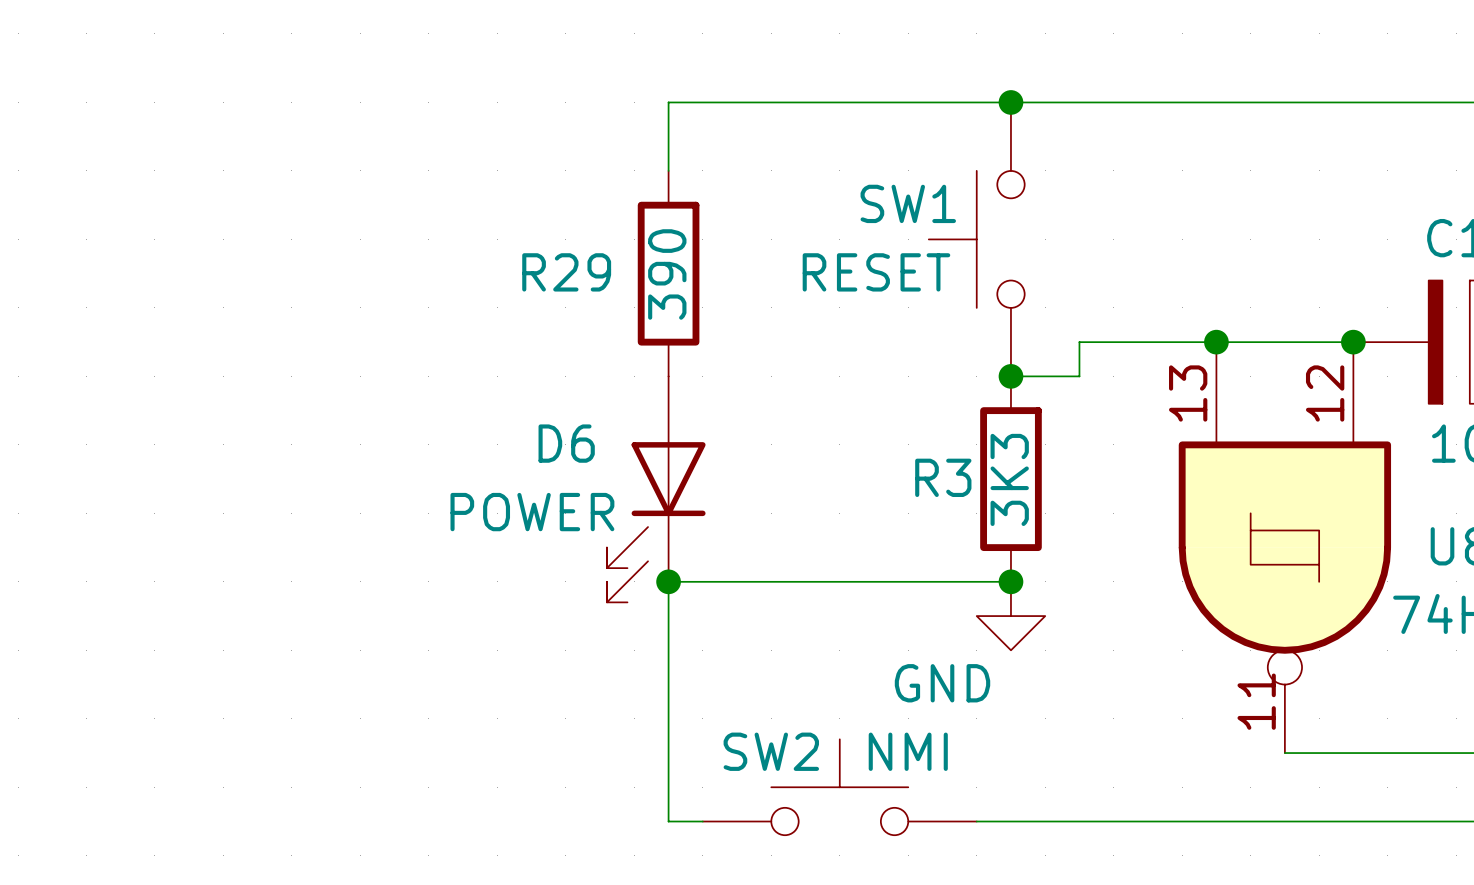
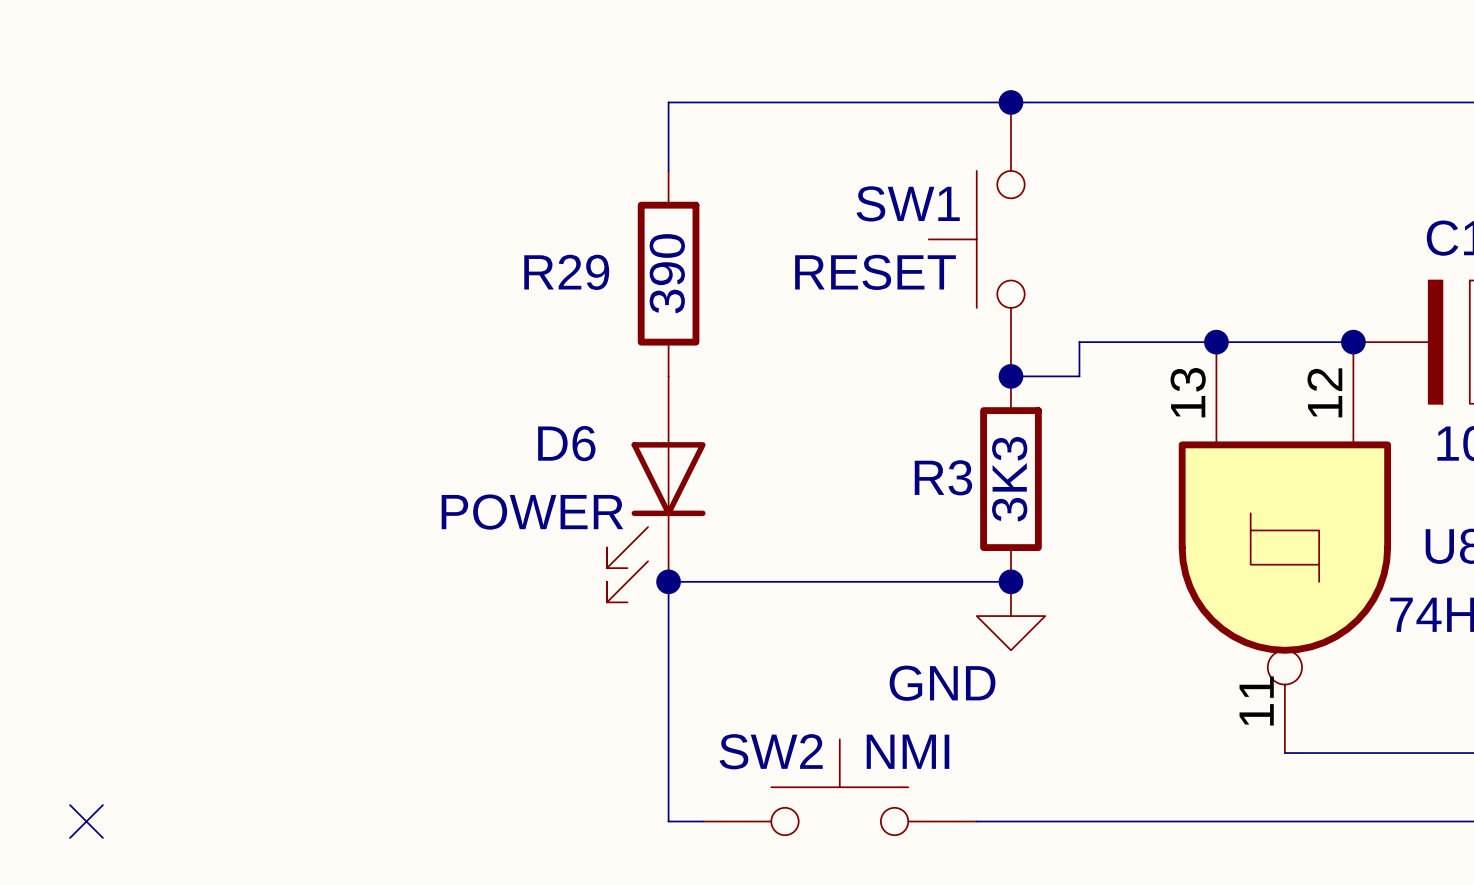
no-connect mark: none -> (86, 821)

